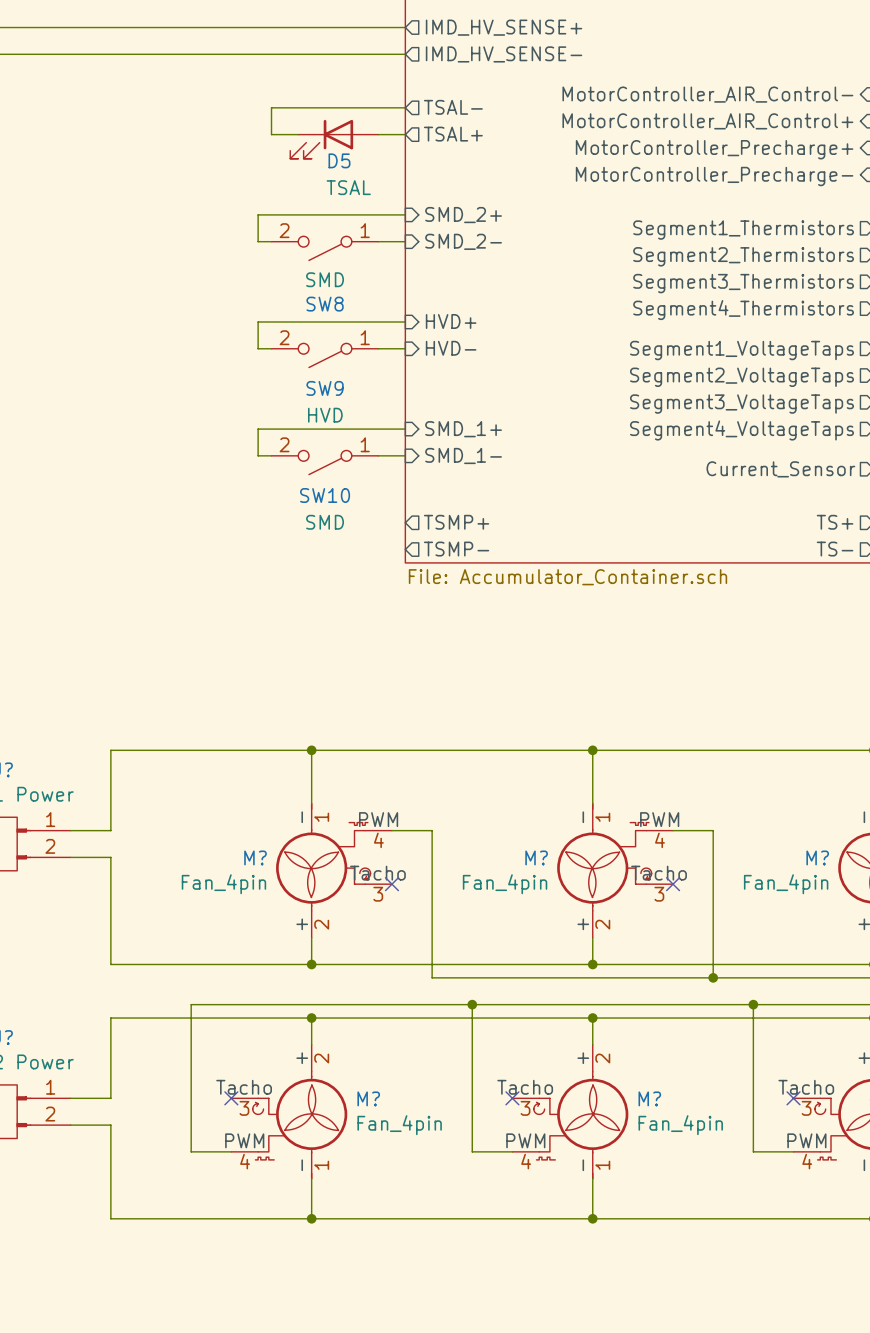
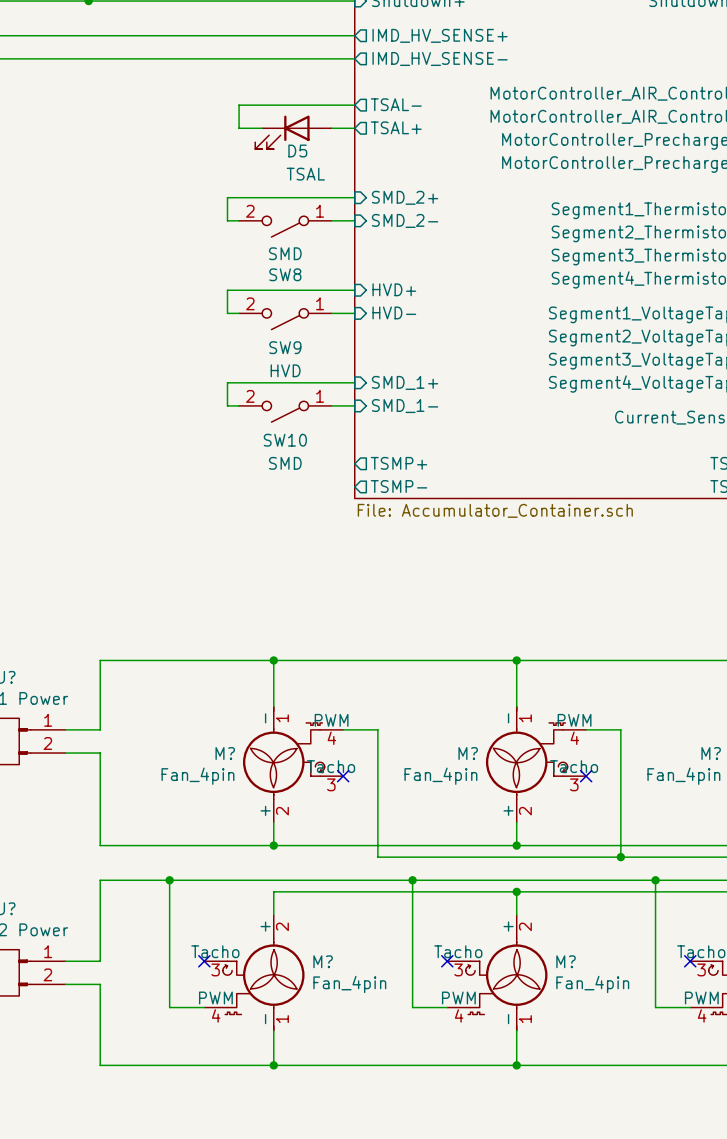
junction: none -> (169, 880)
wire: (110, 1018) (311, 1018) -> (100, 891) (100, 880) (169, 880)
junction: (311, 1018) -> none

